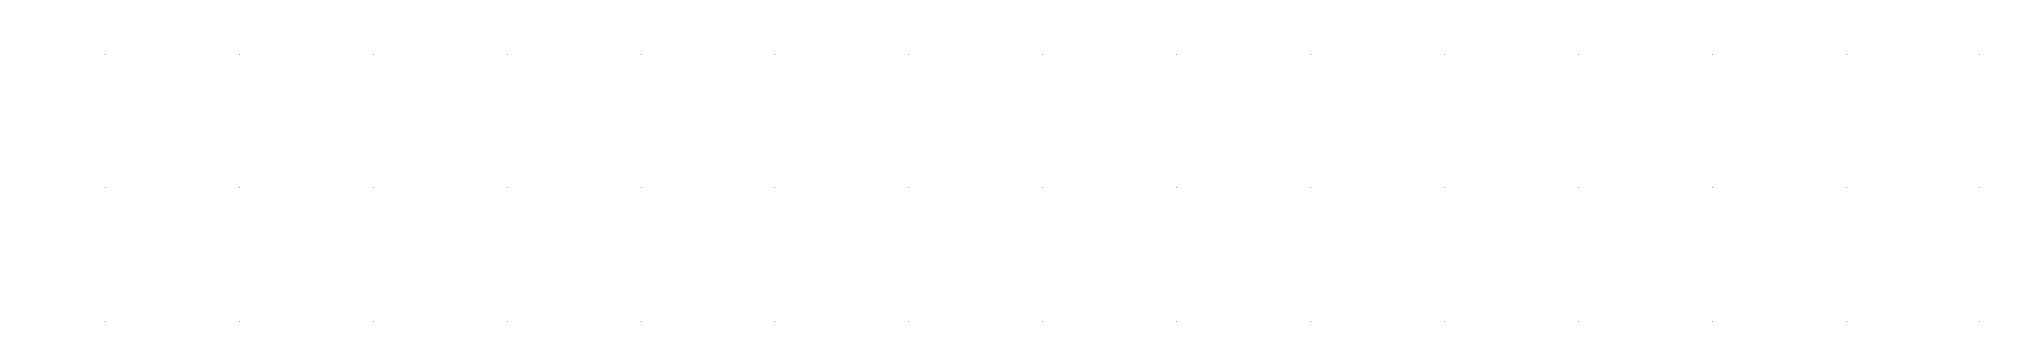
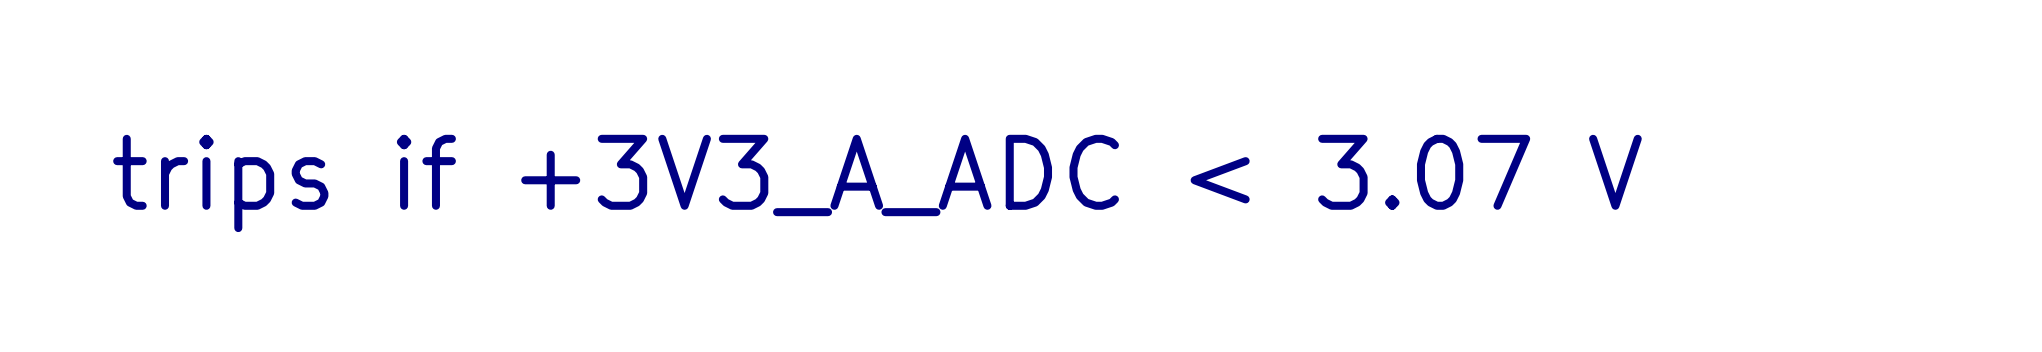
text: none -> trips if +3V3_A_ADC < 3.07 V (877, 183)

